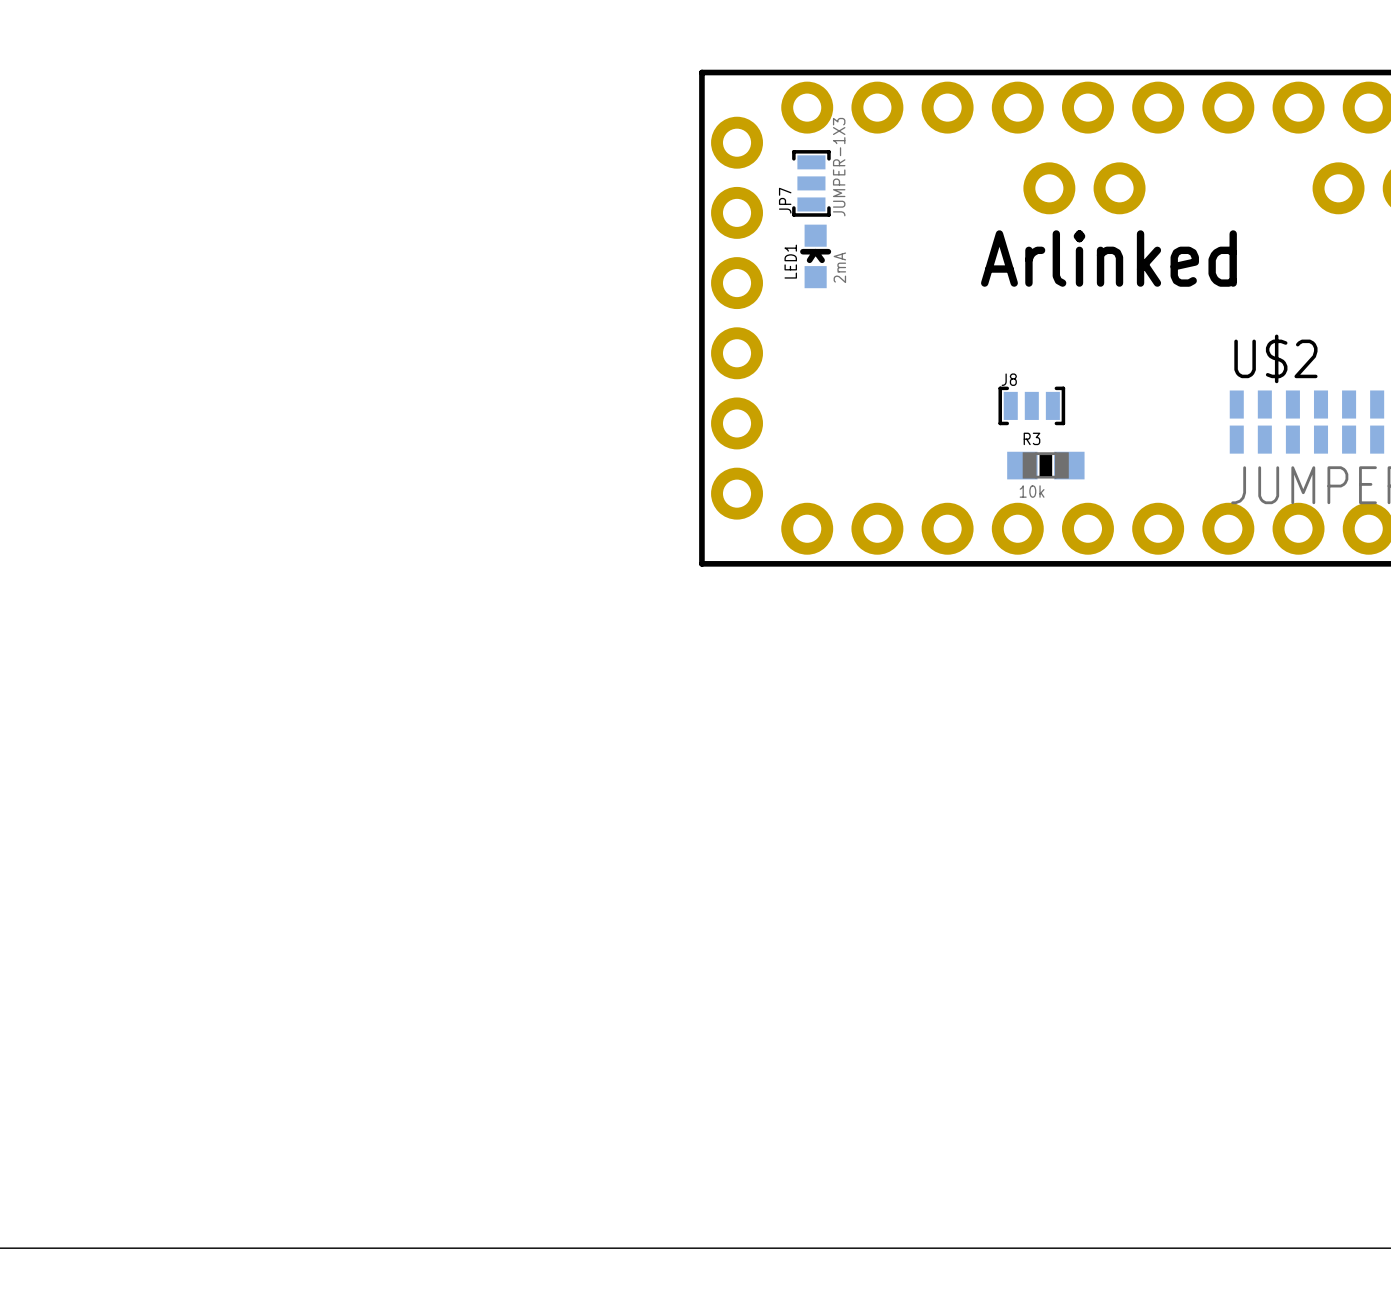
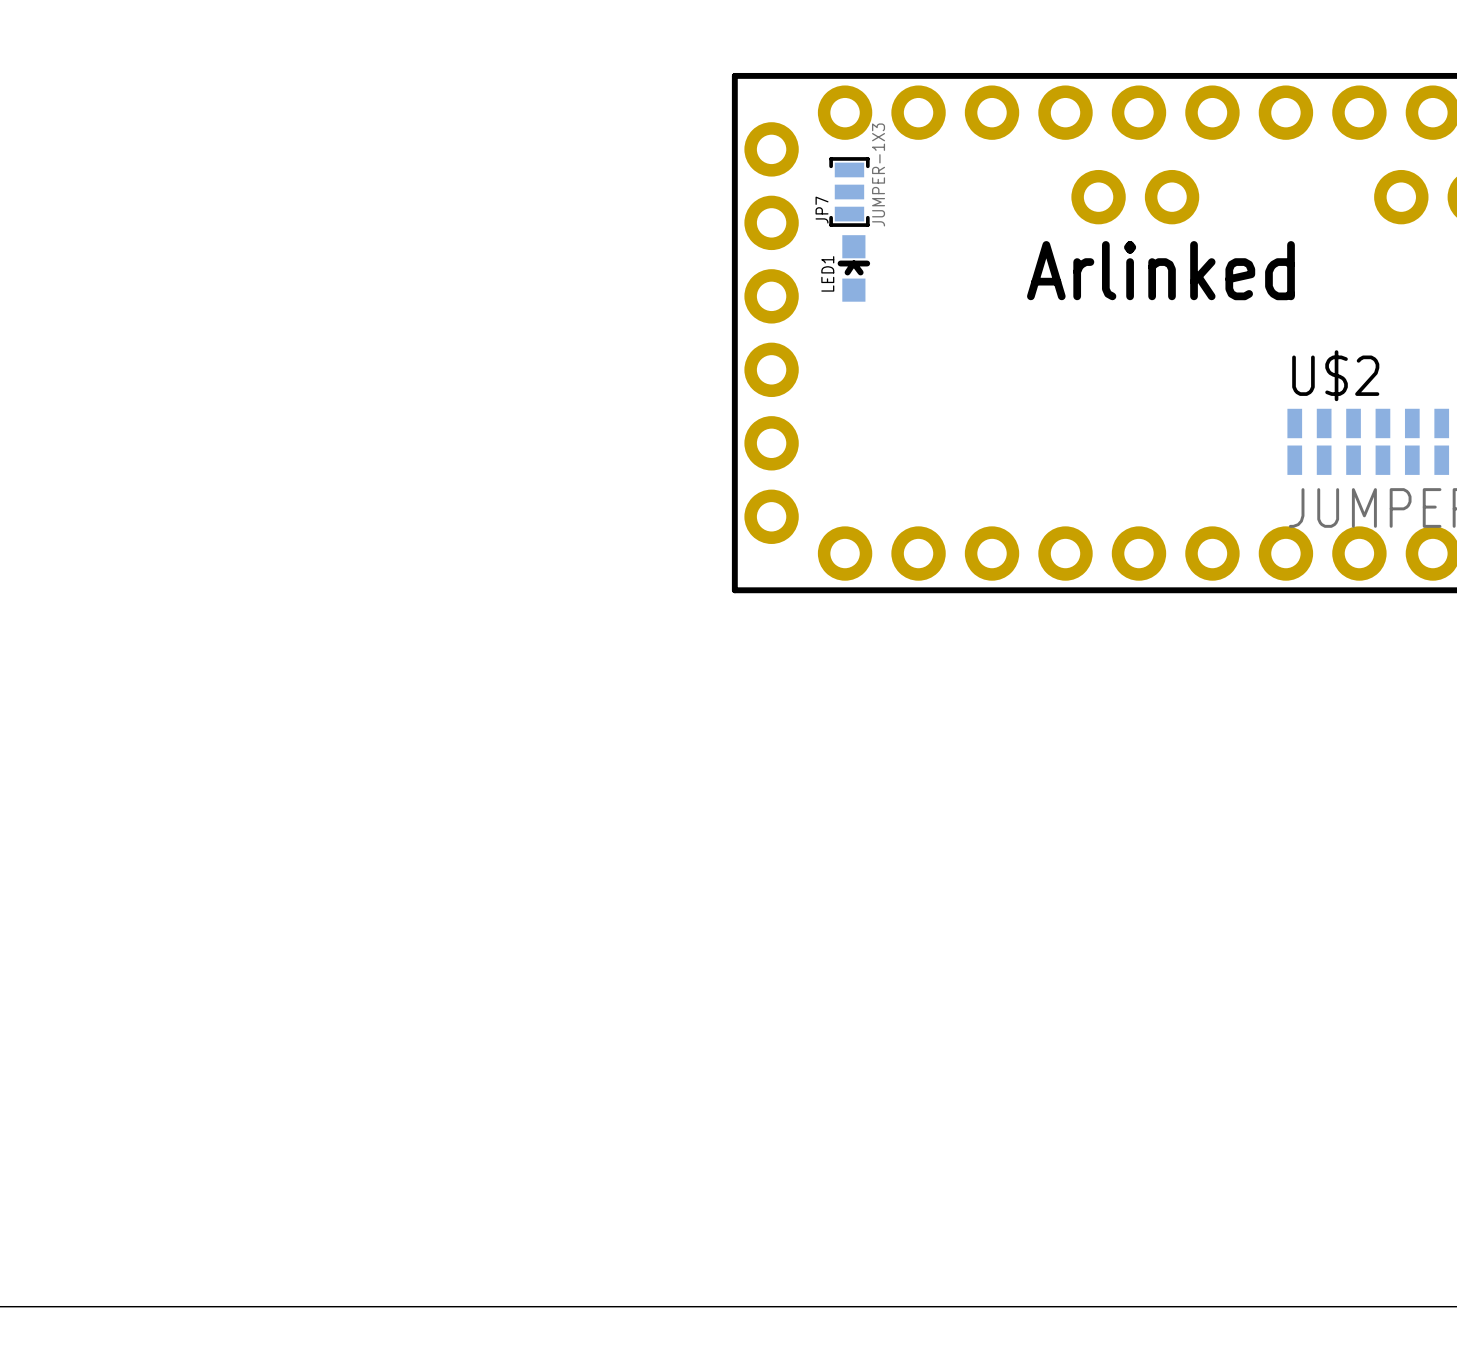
LED1 value: 2mA (839, 267) -> none
J8: (1031, 405) -> none
R3: 10k (1045, 465) -> none

